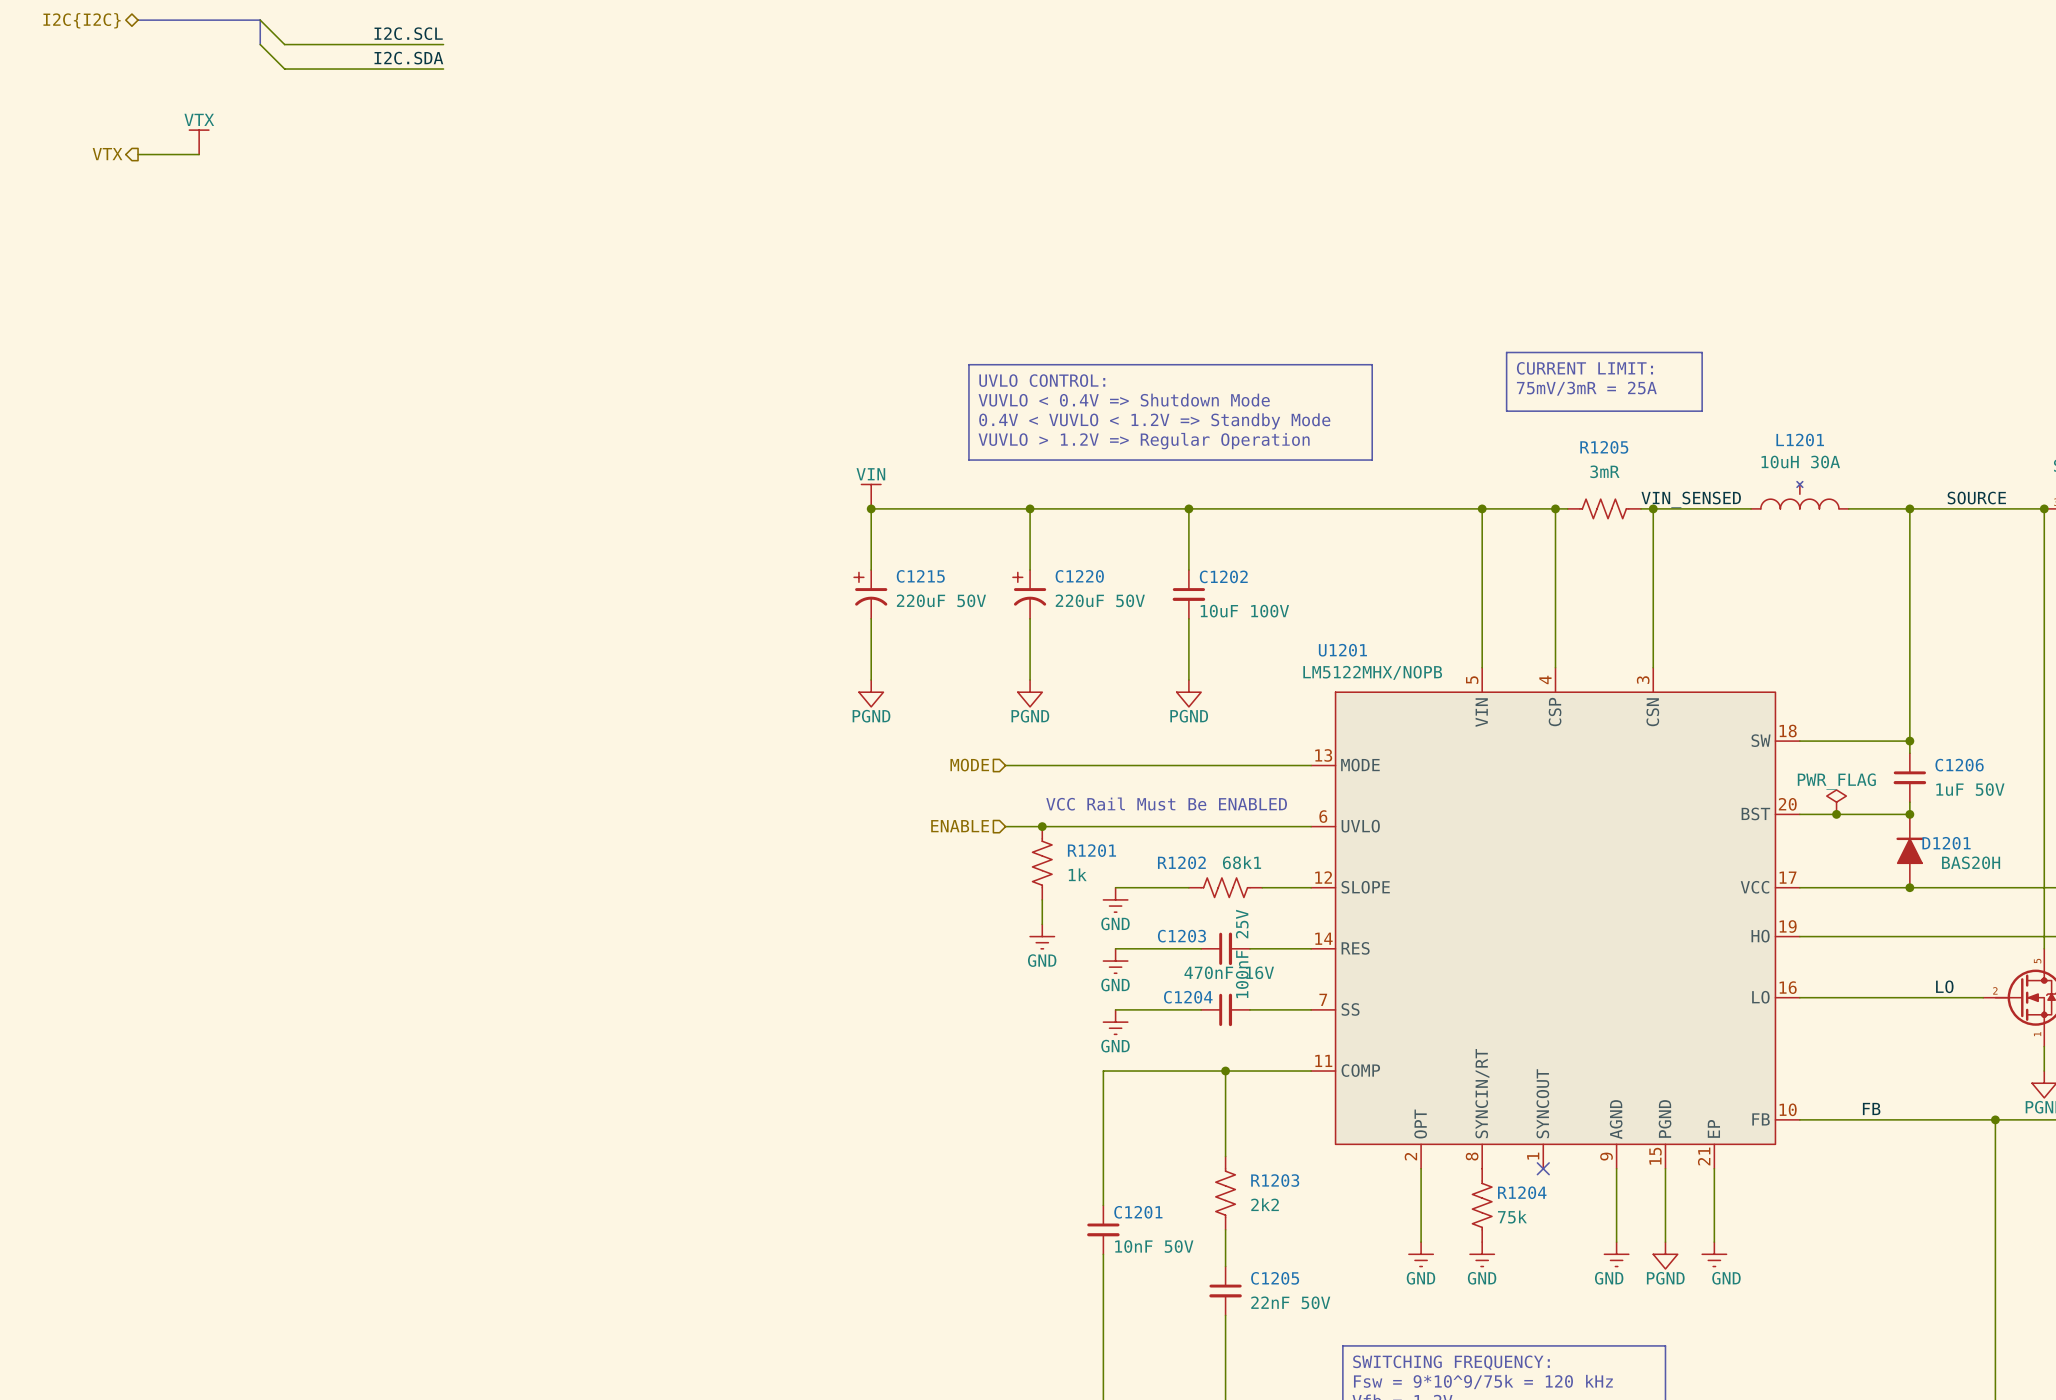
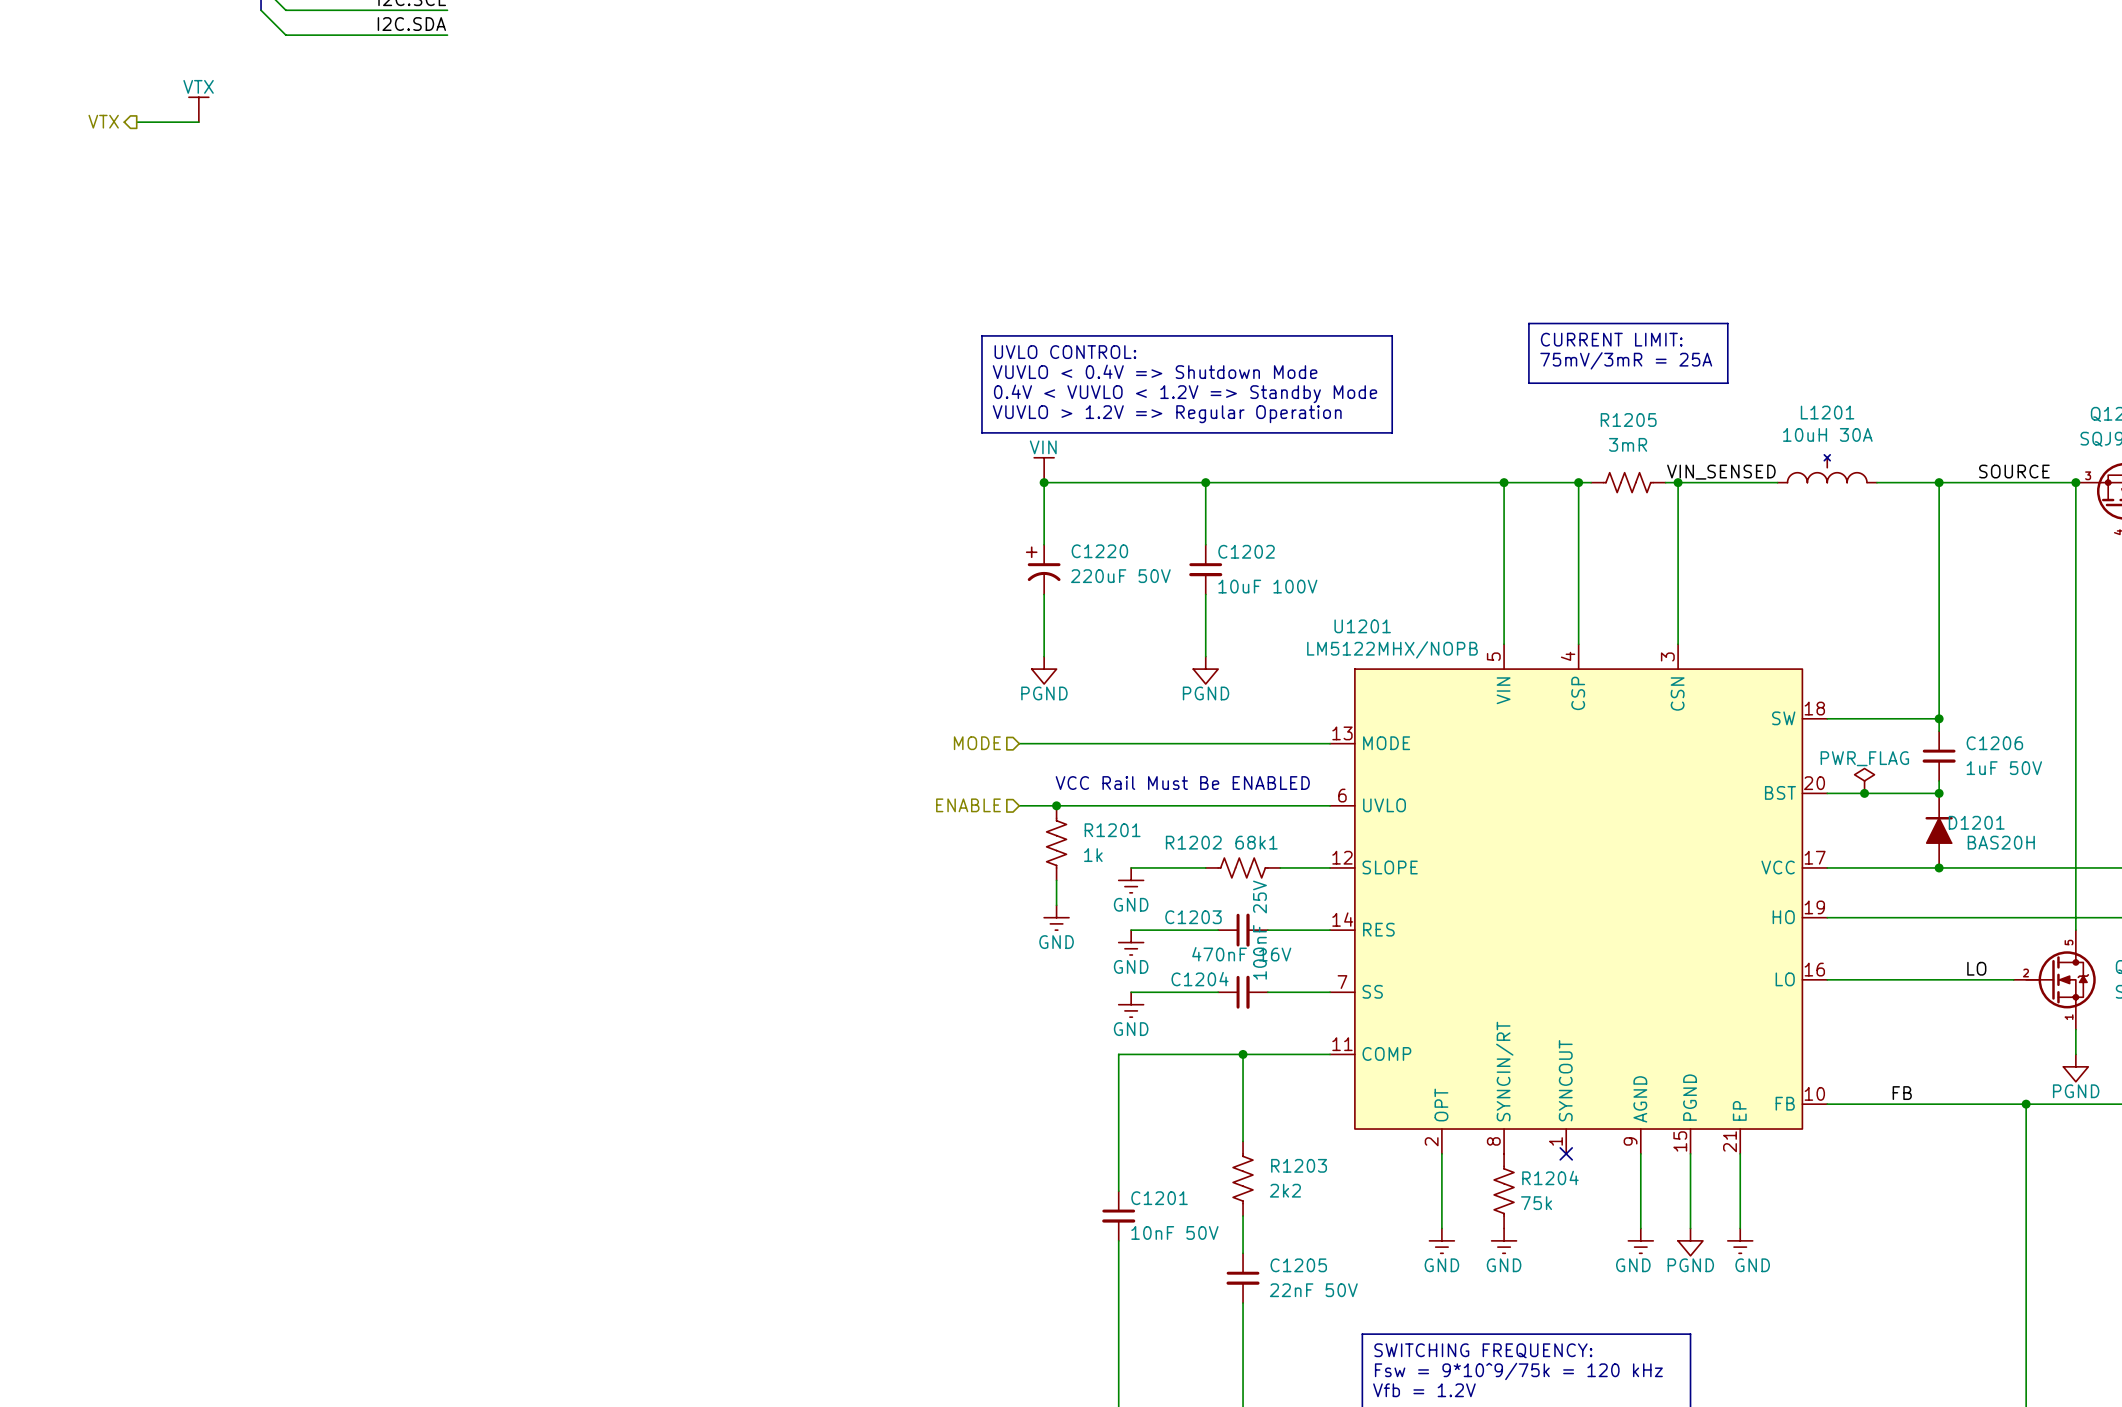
power symbol position: VIN (871, 496) -> VIN (1044, 470)
junction: (871, 508) -> none
wire: (1030, 508) (871, 508) (871, 570) -> none
C1215: 220uF 50V (870, 594) -> none
wire: (871, 618) (871, 679) -> none
power symbol: PGND (871, 693) -> none

